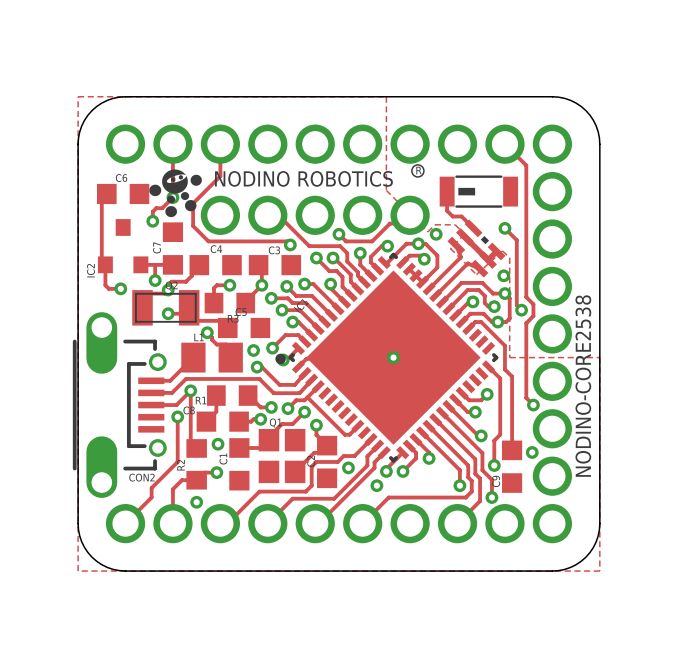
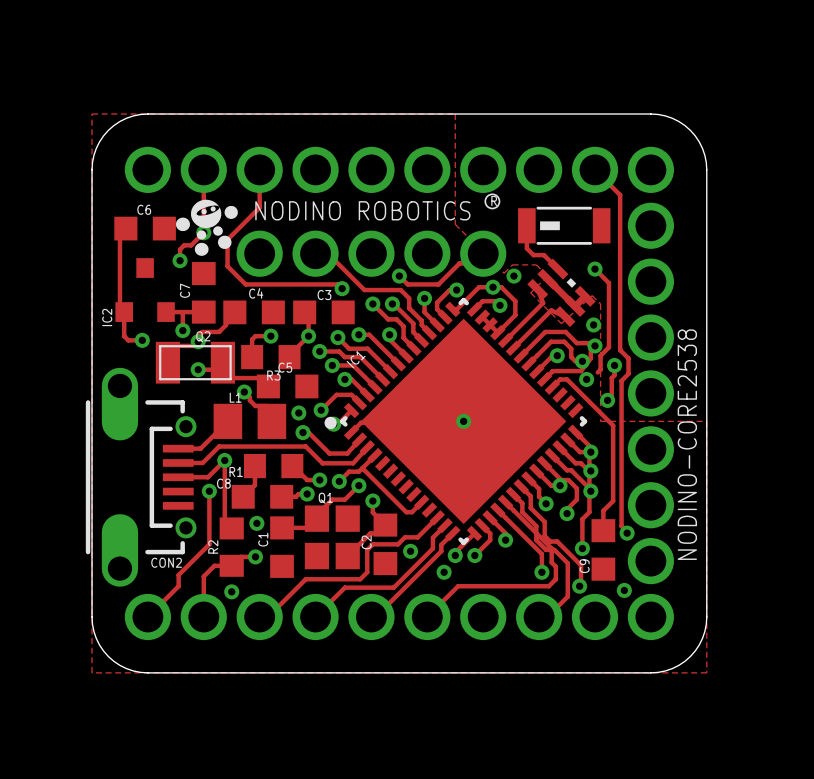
track: (461, 282) (482, 282) (493, 293) (504, 293) (509, 298) (509, 301) -> (543, 333) (565, 331) (576, 343) (588, 343) (590, 345) (590, 358) (581, 371) (552, 371)
track: (516, 294) (516, 305) (521, 310) -> (608, 347) (600, 355)
track: none -> (614, 362) (614, 375) (611, 378) (611, 396) (607, 400)
track: (509, 313) (509, 318) (506, 322) (491, 322) (483, 313) (469, 314) -> (600, 369) (597, 372)
track: (533, 316) (526, 323) (526, 397) (533, 405) -> (628, 372) (621, 380) (621, 526) (628, 533)
via: none -> (607, 400)
track: (504, 345) (504, 369) (512, 376) (512, 433) -> (595, 407) (613, 425) (613, 501) (603, 510)
track: none -> (567, 440) (579, 452) (590, 452)
track: none -> (560, 447) (575, 463) (581, 463) (590, 470)
via: none -> (590, 452)
track: none -> (552, 455) (567, 470) (571, 470) (590, 491)
track: (487, 394) (481, 400) (469, 400) -> (562, 513) (576, 499) (576, 488) (568, 480) (561, 480) (552, 471)
via: (487, 394) -> none
via: none -> (590, 470)
via: (533, 405) -> none
track: (457, 415) (478, 435) (481, 435) -> (539, 489) (539, 496) (546, 503)
via: none -> (590, 491)
track: (450, 421) (482, 453) (482, 470) (491, 479) (491, 497) -> (530, 496) (530, 508) (544, 521) (544, 535) (550, 541) (557, 541) (581, 565) (581, 584)
track: (443, 427) (475, 459) (475, 473) (480, 478) (480, 501) (461, 520) -> (522, 503) (522, 512) (536, 526) (536, 540) (546, 549) (554, 549) (567, 563) (567, 596) (551, 612) (543, 612)
via: none -> (546, 503)
via: none -> (624, 590)

